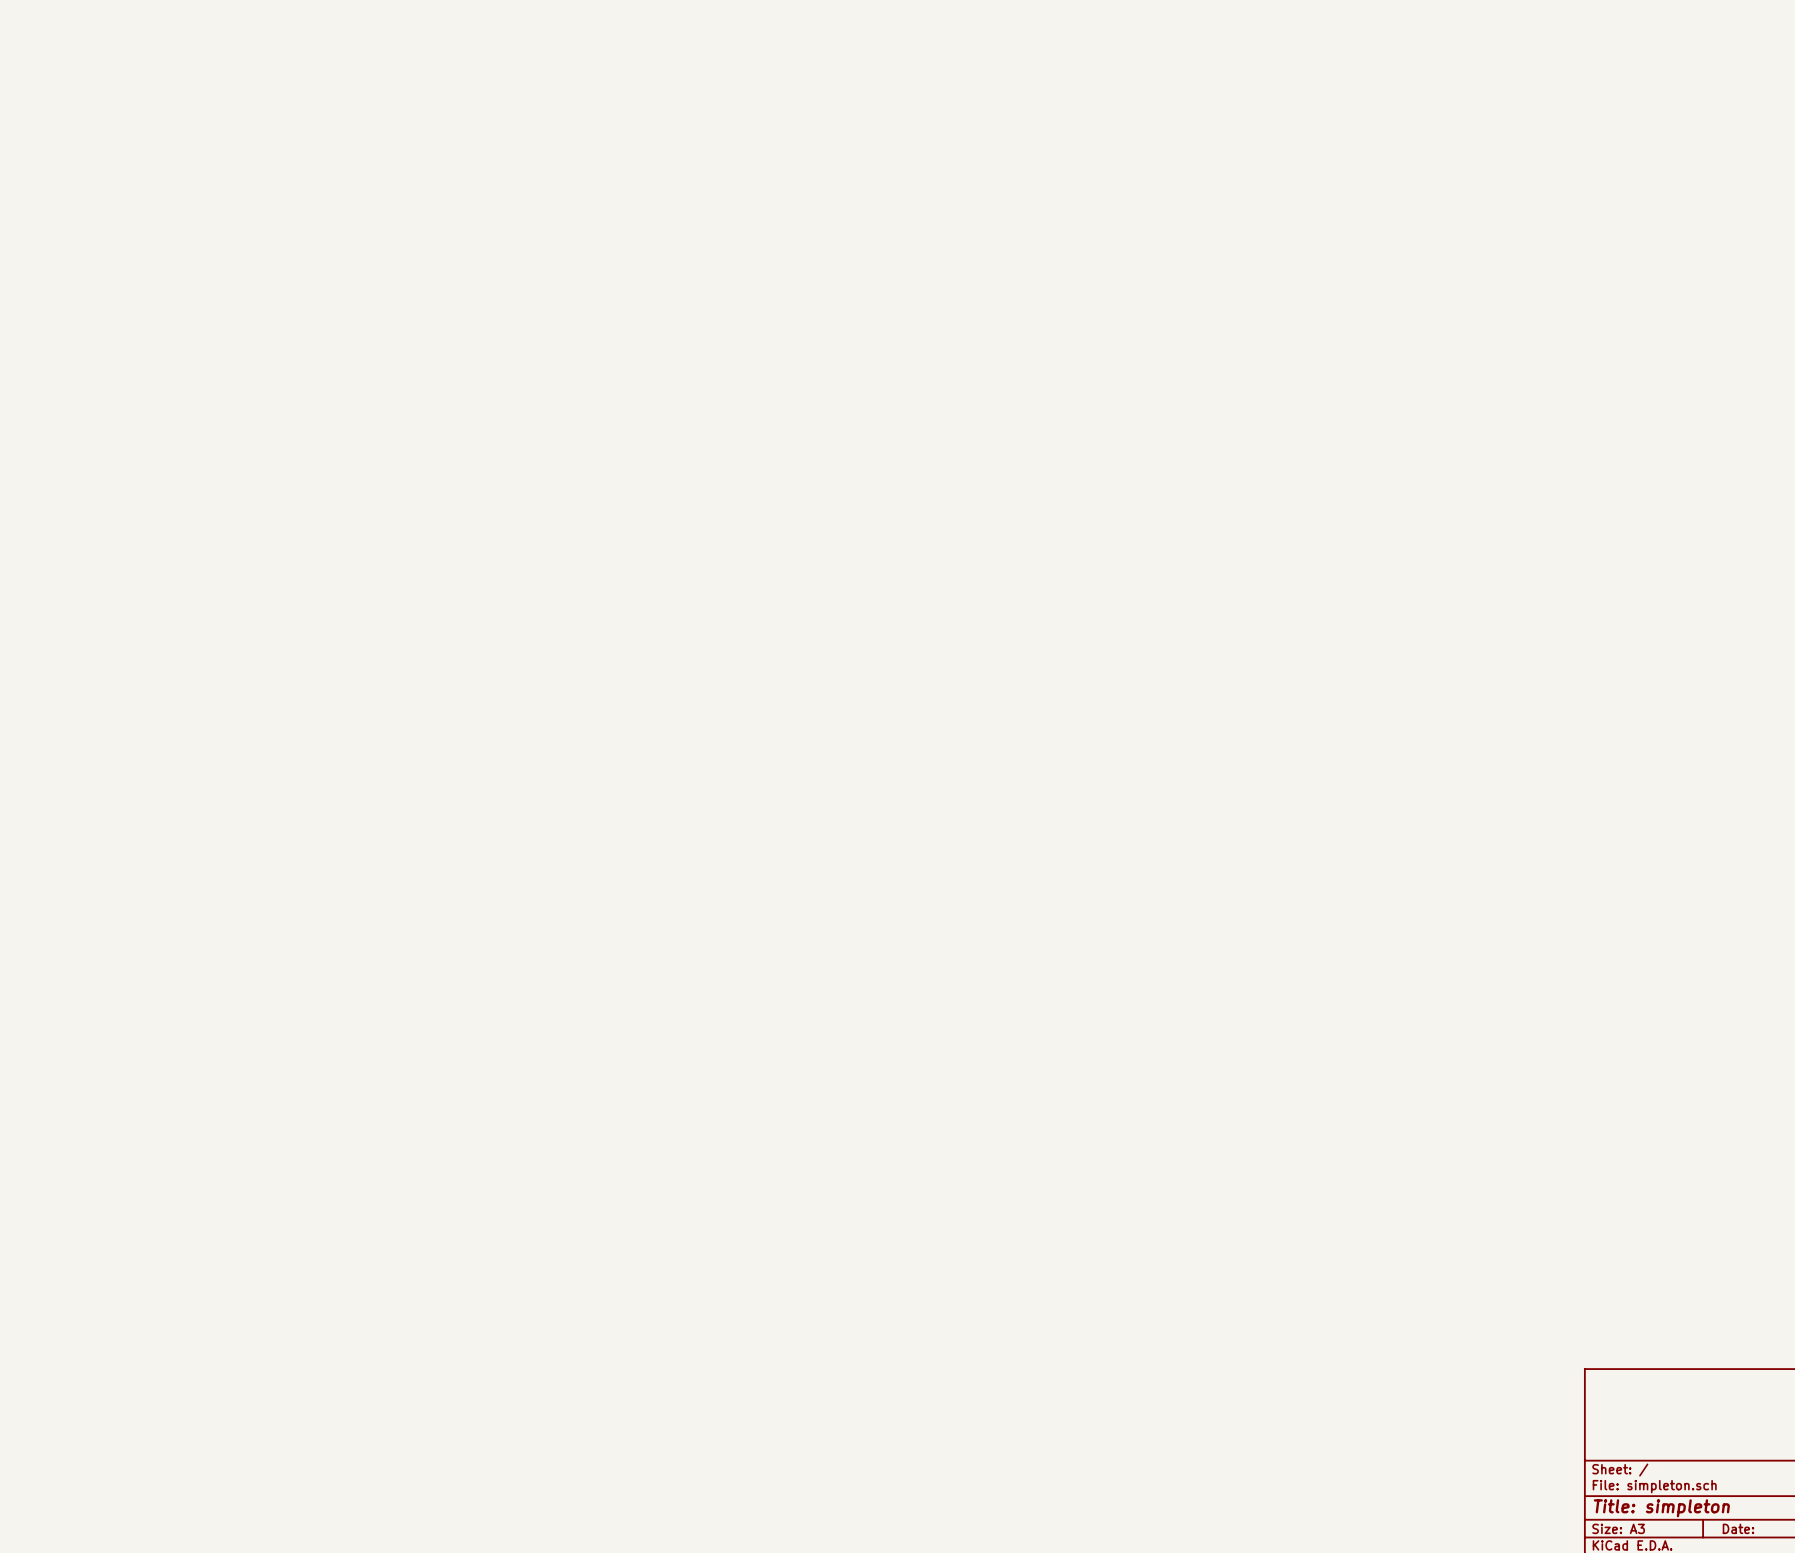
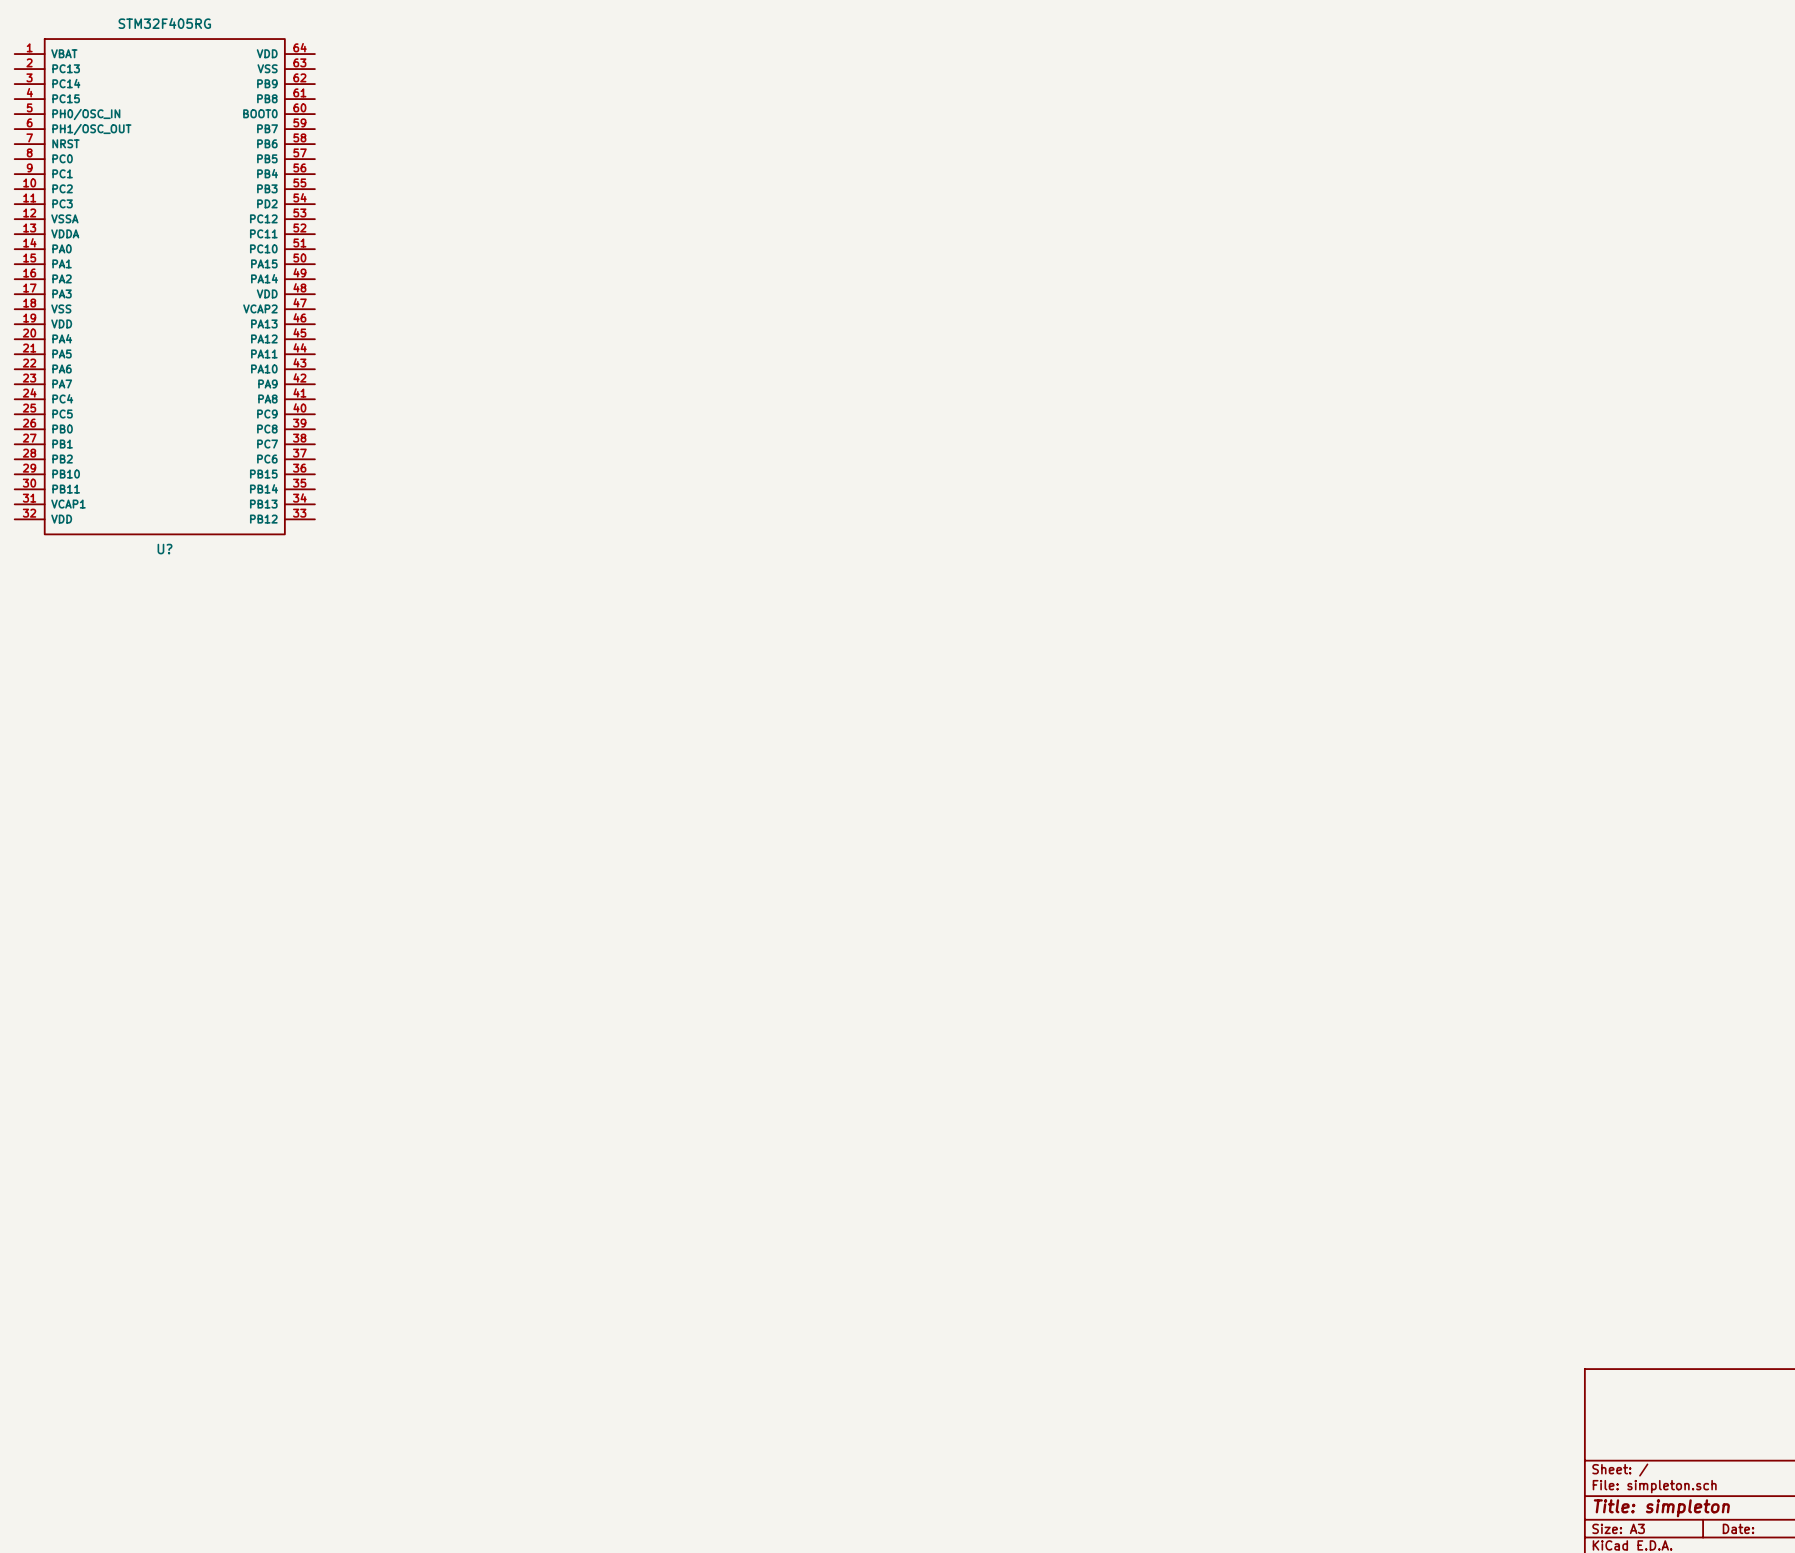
U?: none -> STM32F405RG (164, 286)

